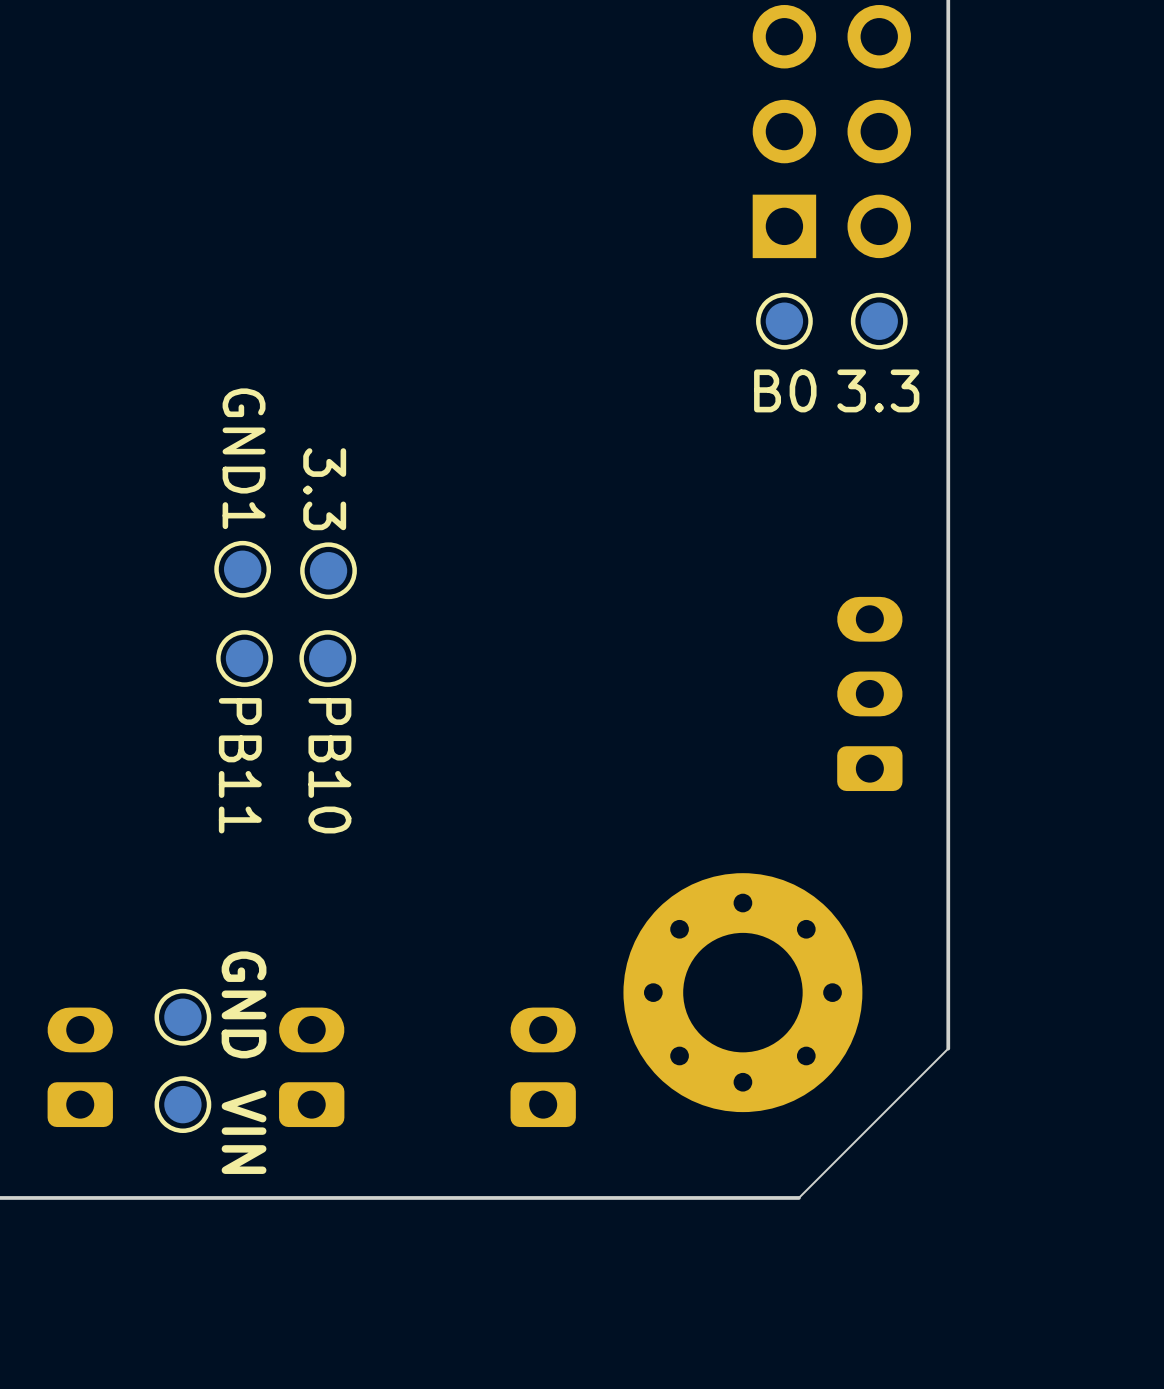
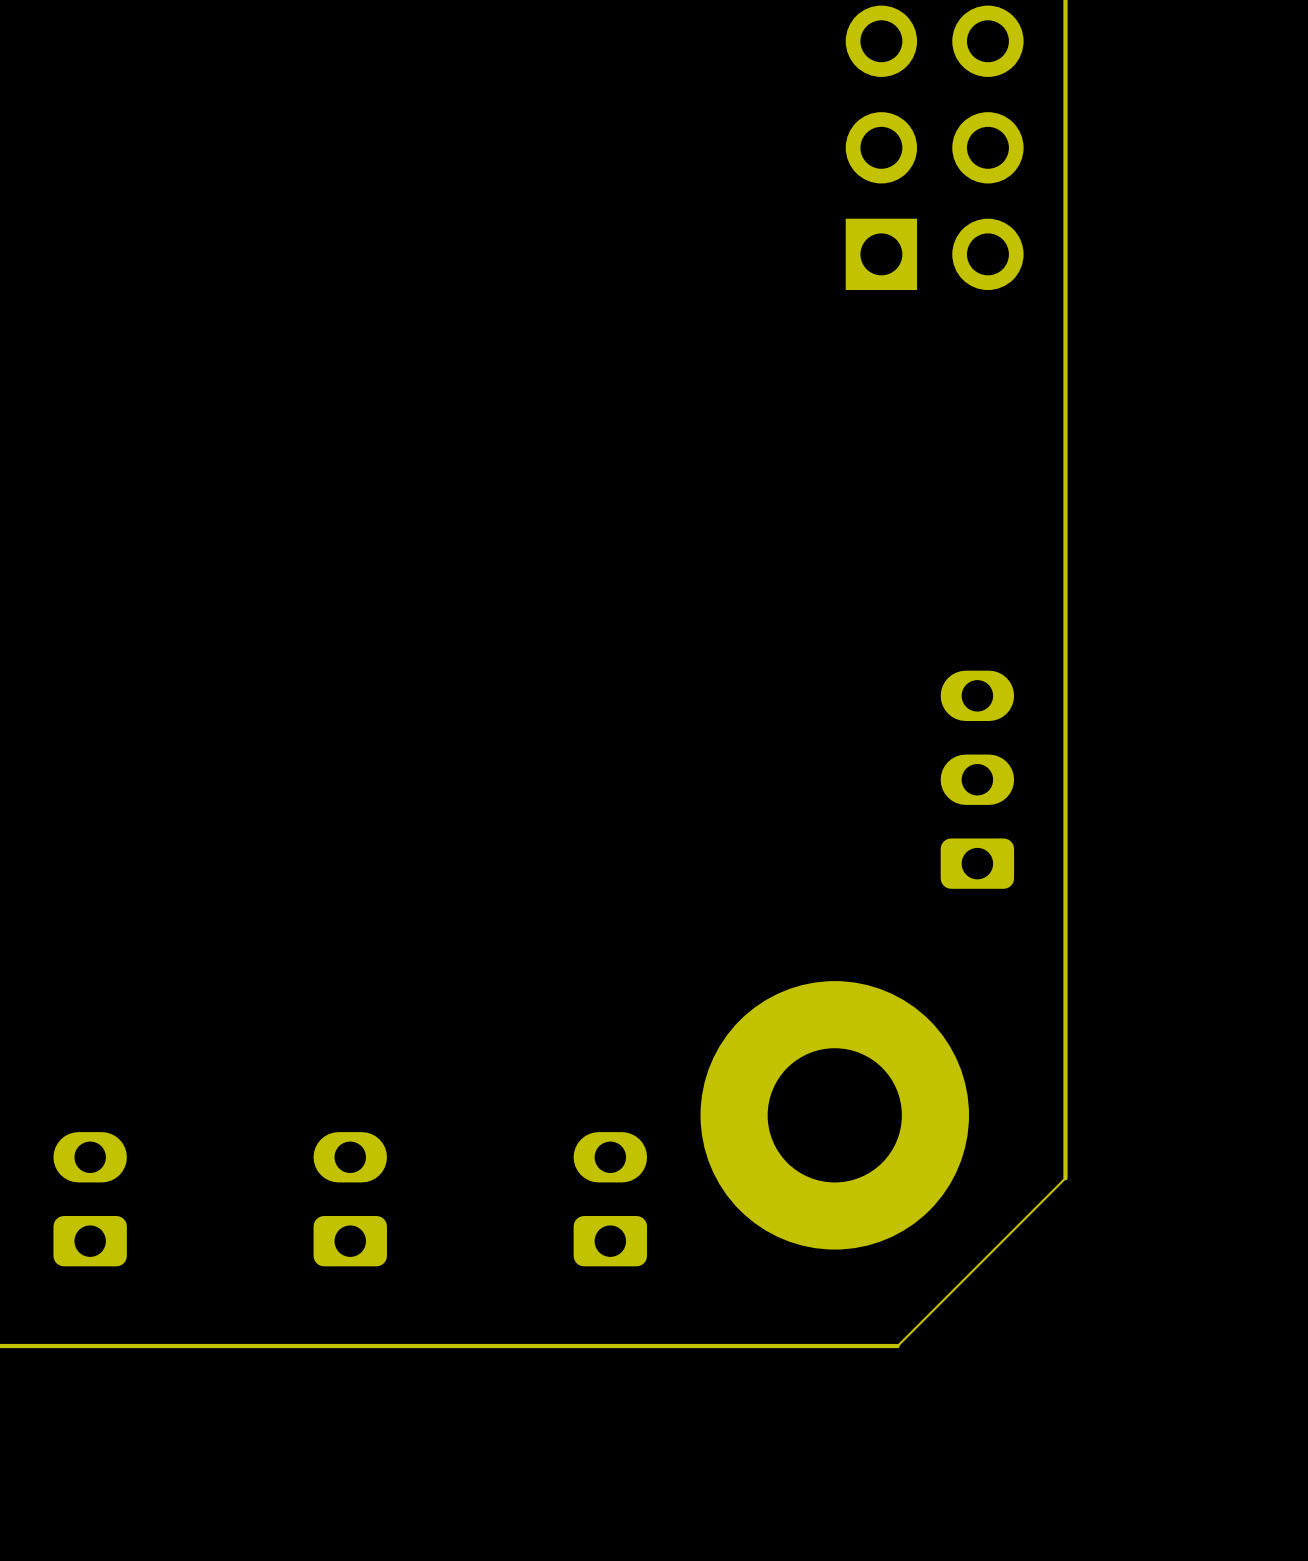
part: (784, 321) -> none
part: (879, 321) -> none
text: B0 (785, 390) -> none
text: 3.3 (878, 390) -> none
GND1: (242, 569) -> none
3.3: (328, 570) -> none
PB11: (244, 658) -> none
PB10: (327, 658) -> none
part footprint: [623, 873, 863, 1113] -> [700, 981, 970, 1250]
part: (182, 1017) -> none
text: GND VIN (244, 1062) -> none
part: (182, 1104) -> none

